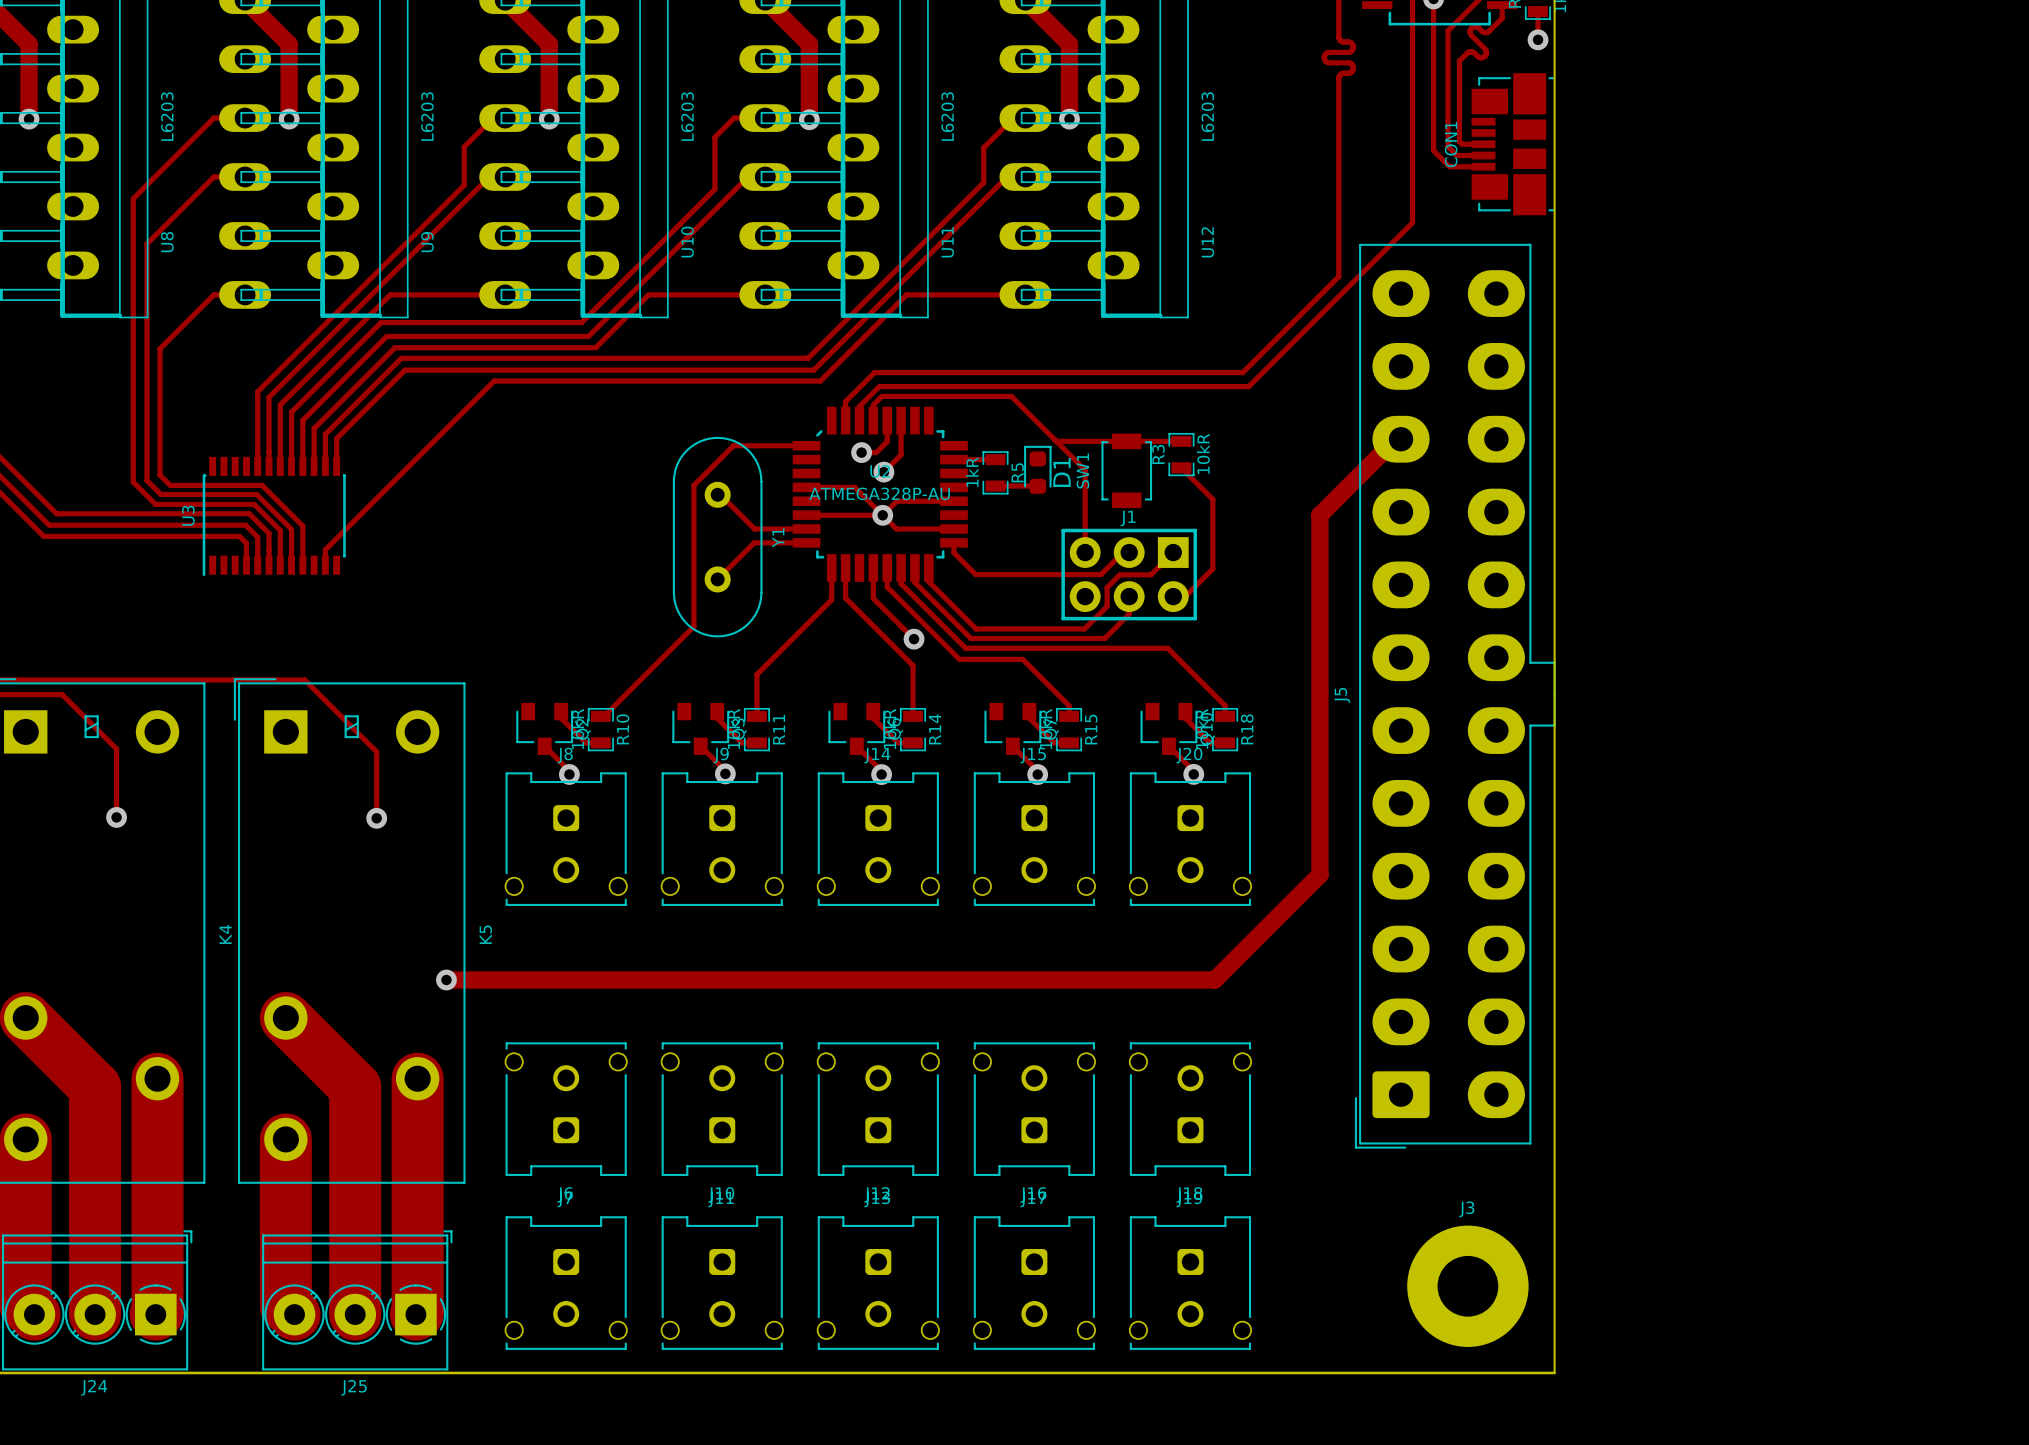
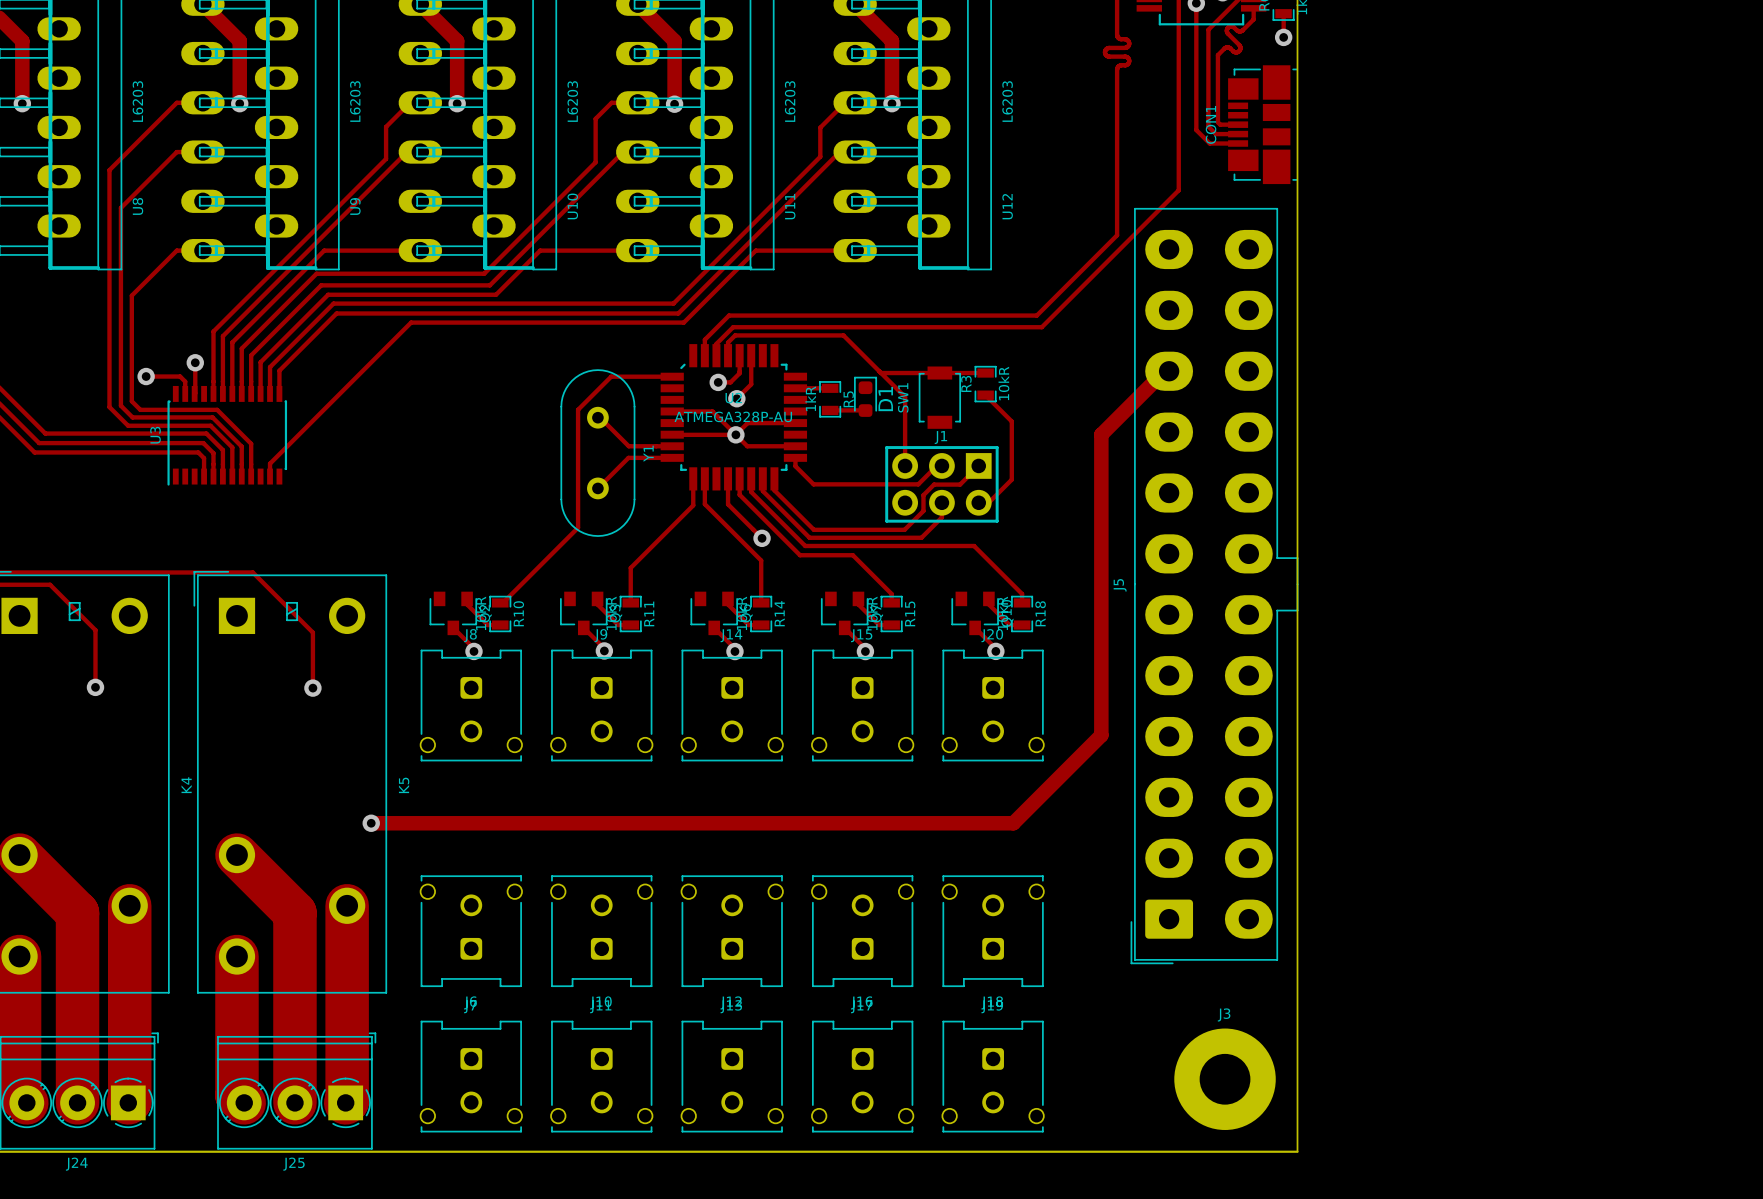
track: none -> (195, 362) (194, 393)
via: none -> (195, 362)
track: none -> (146, 376) (180, 376) (185, 381) (185, 393)
via: none -> (146, 376)

